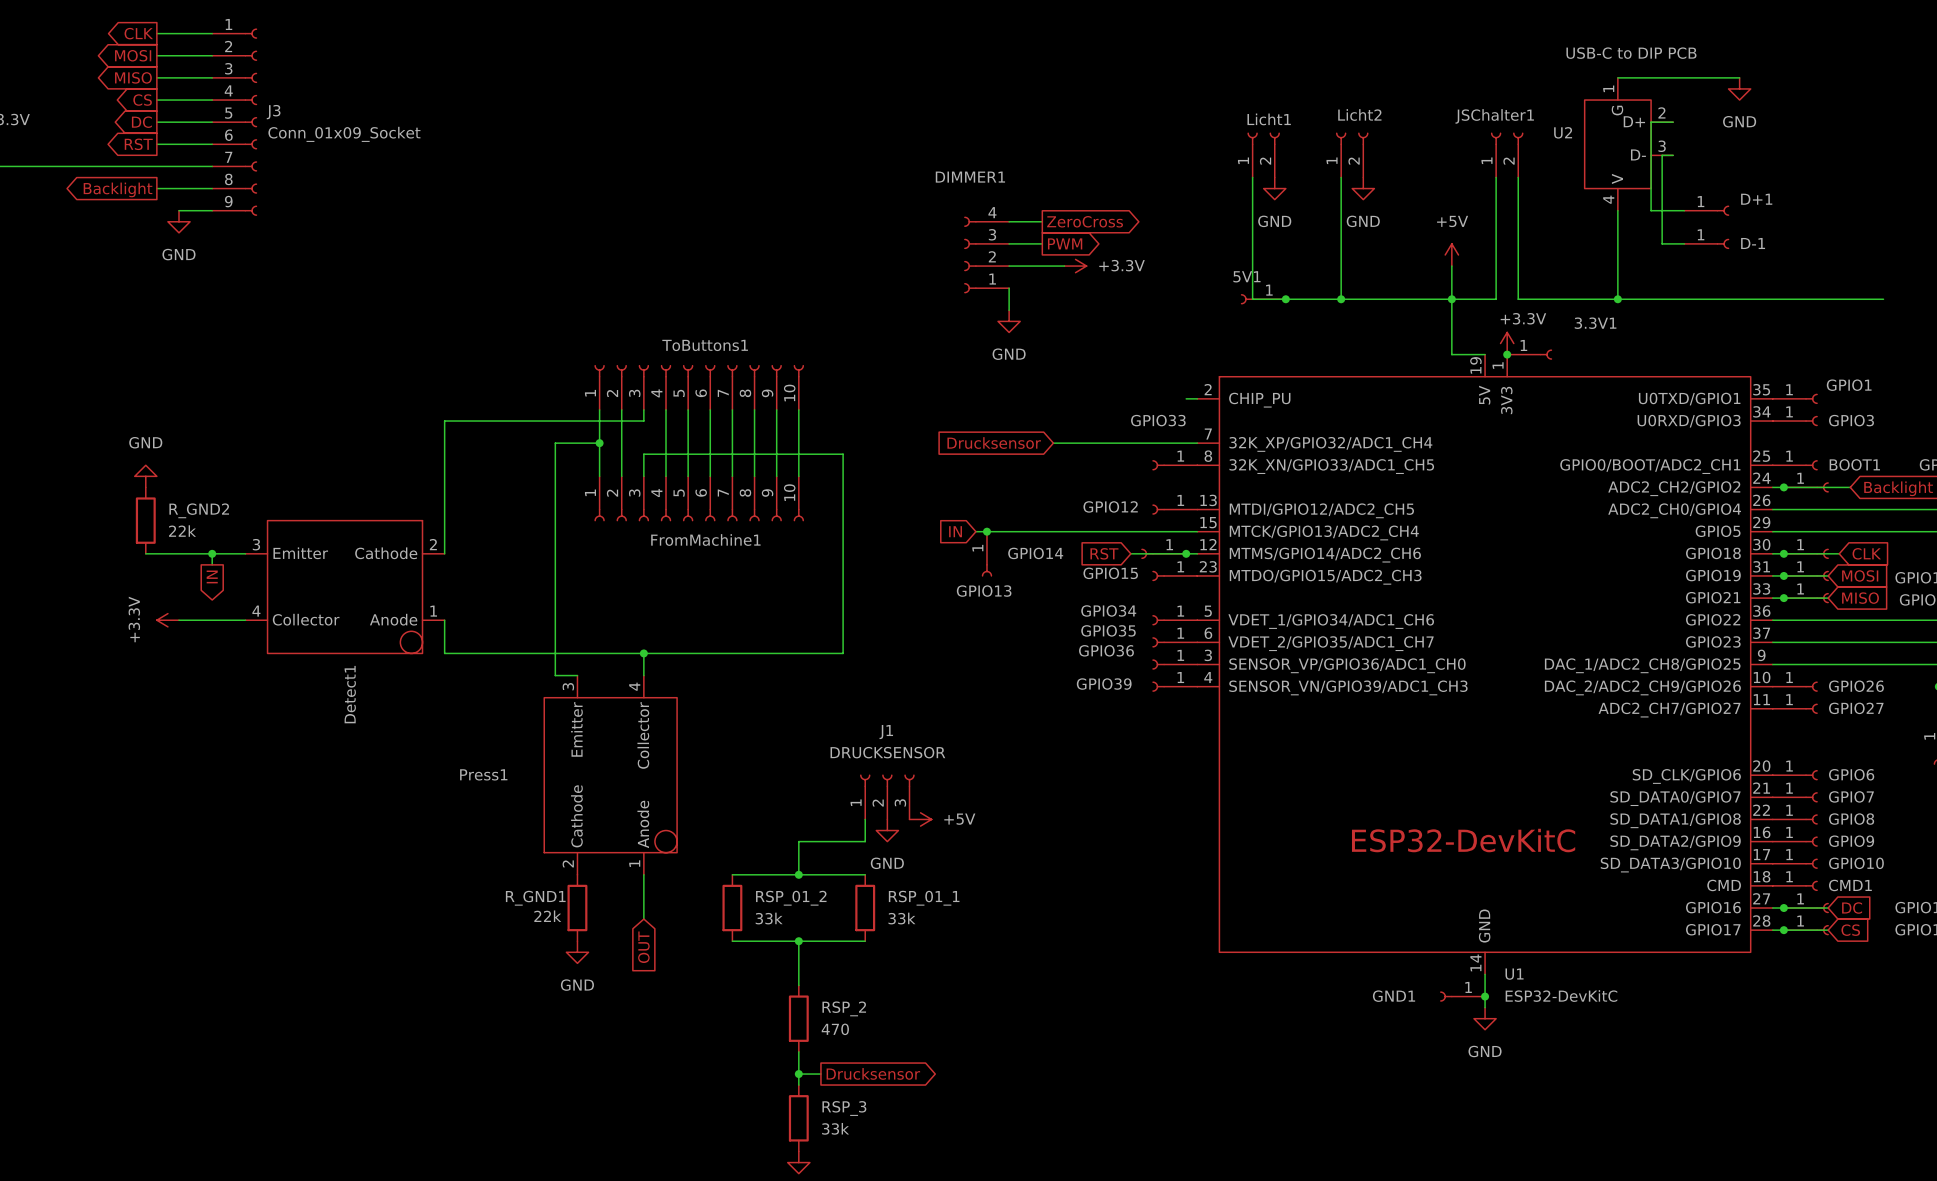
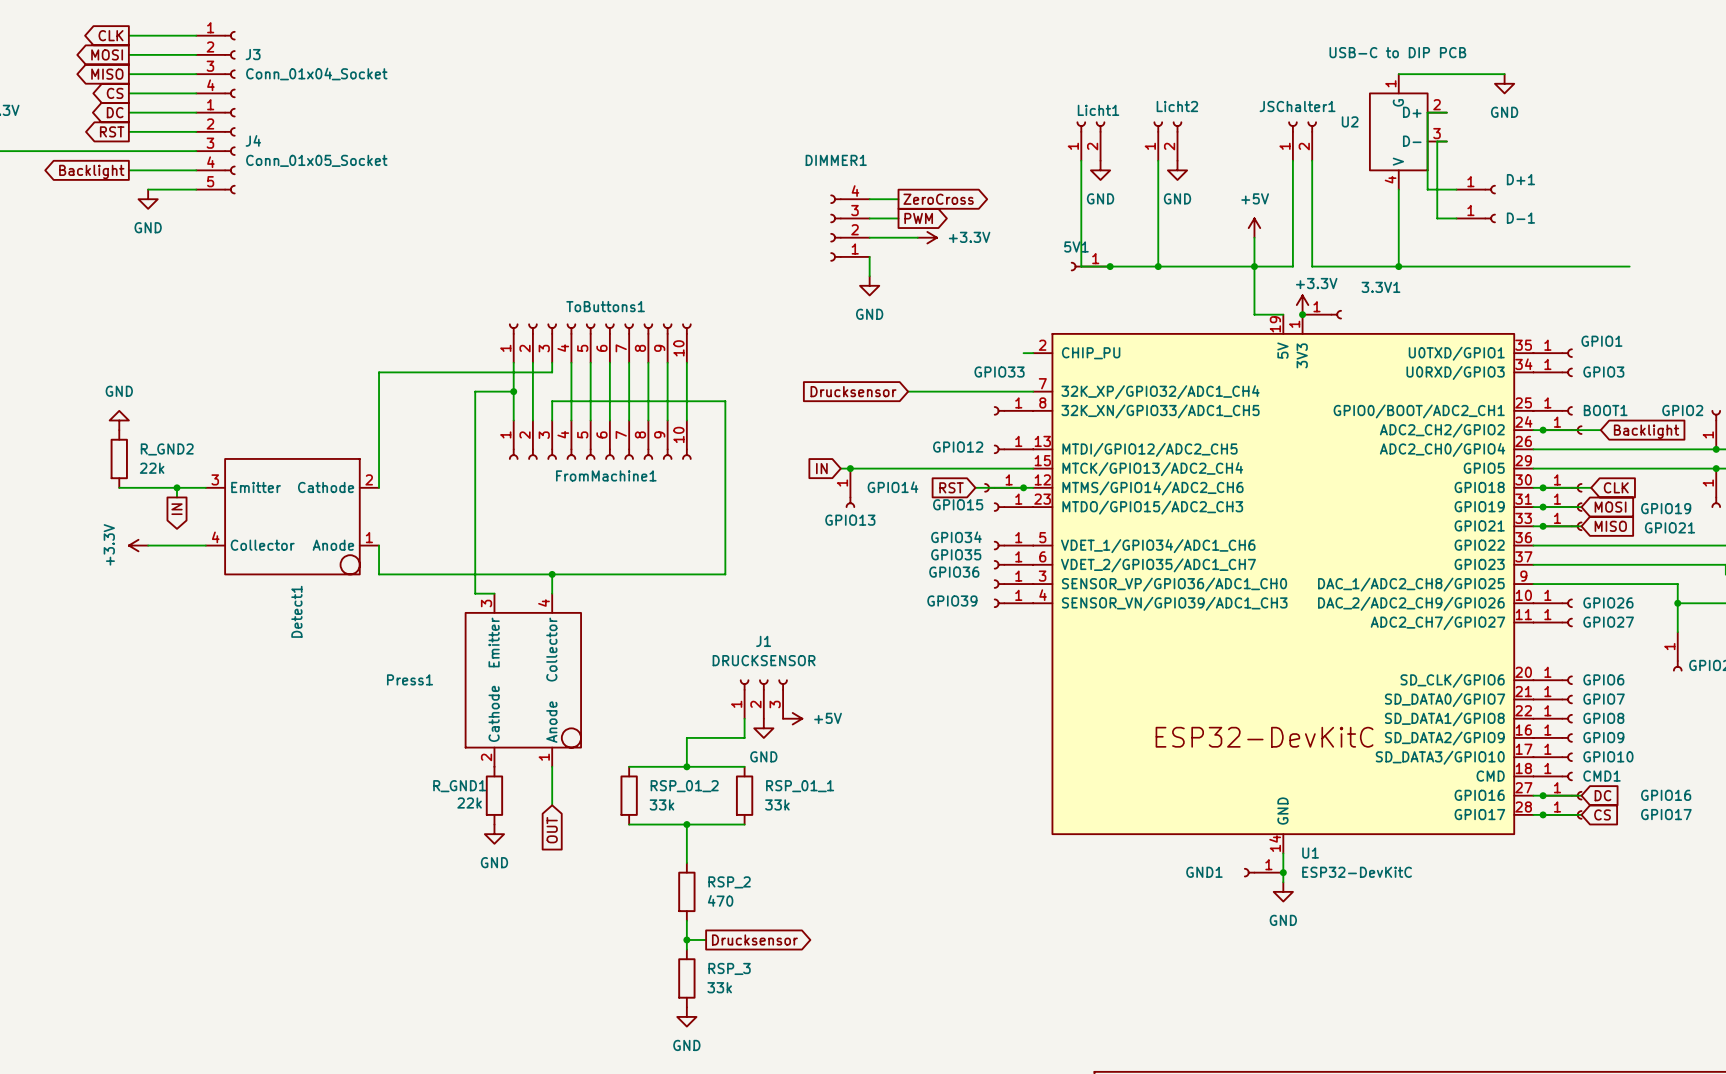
J3 symbol: [212, 28, 258, 216] -> [196, 31, 236, 98]
J3 value: Conn_01x09_Socket (344, 134) -> Conn_01x04_Socket (316, 74)
J4: none -> Conn_01x05_Socket (215, 151)

